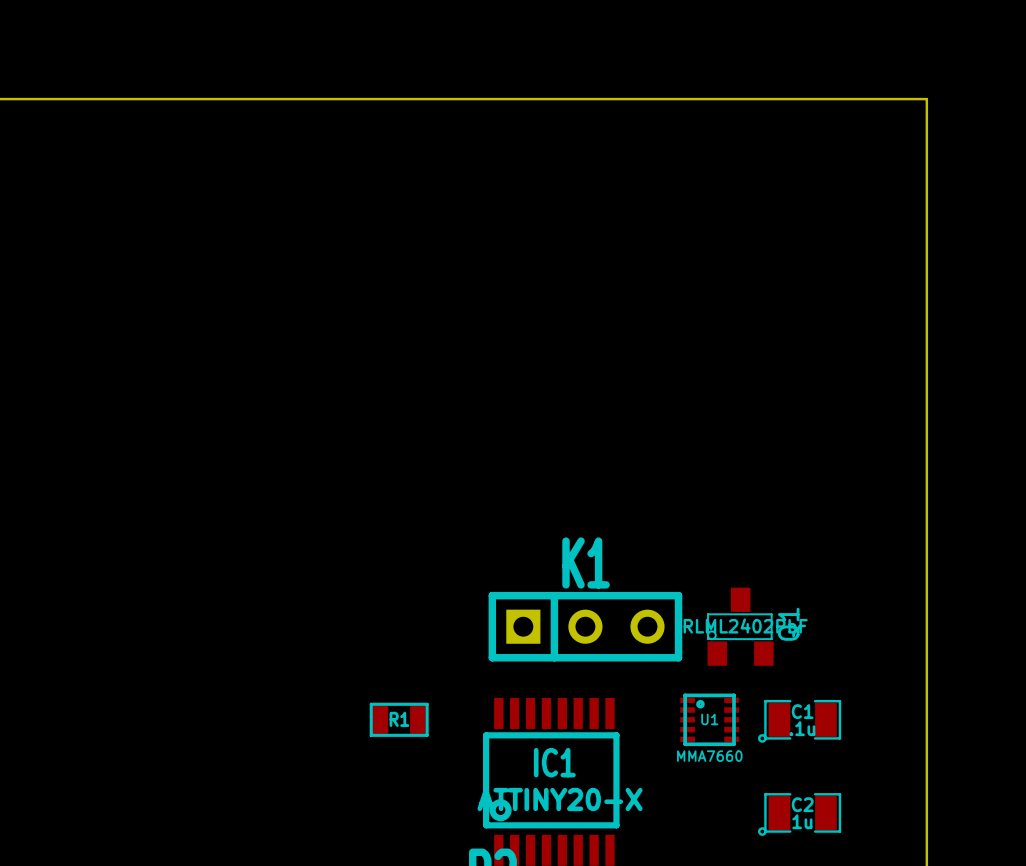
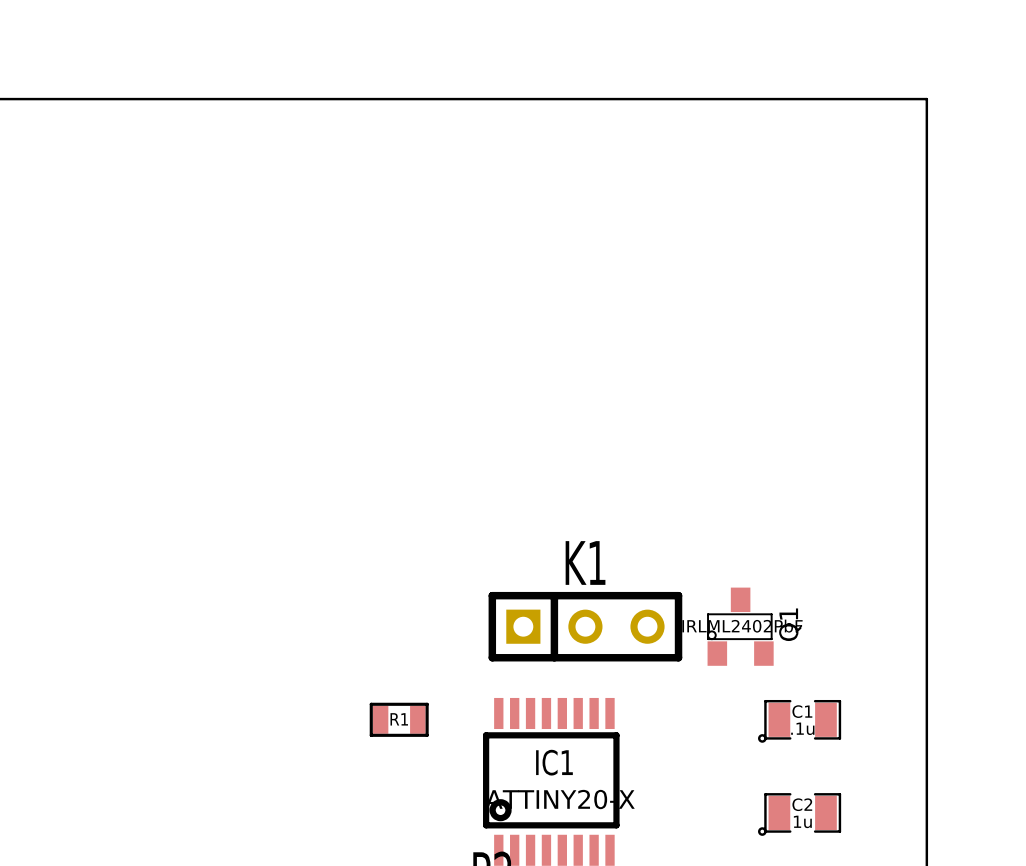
U1: MMA7660 (709, 719) -> none

